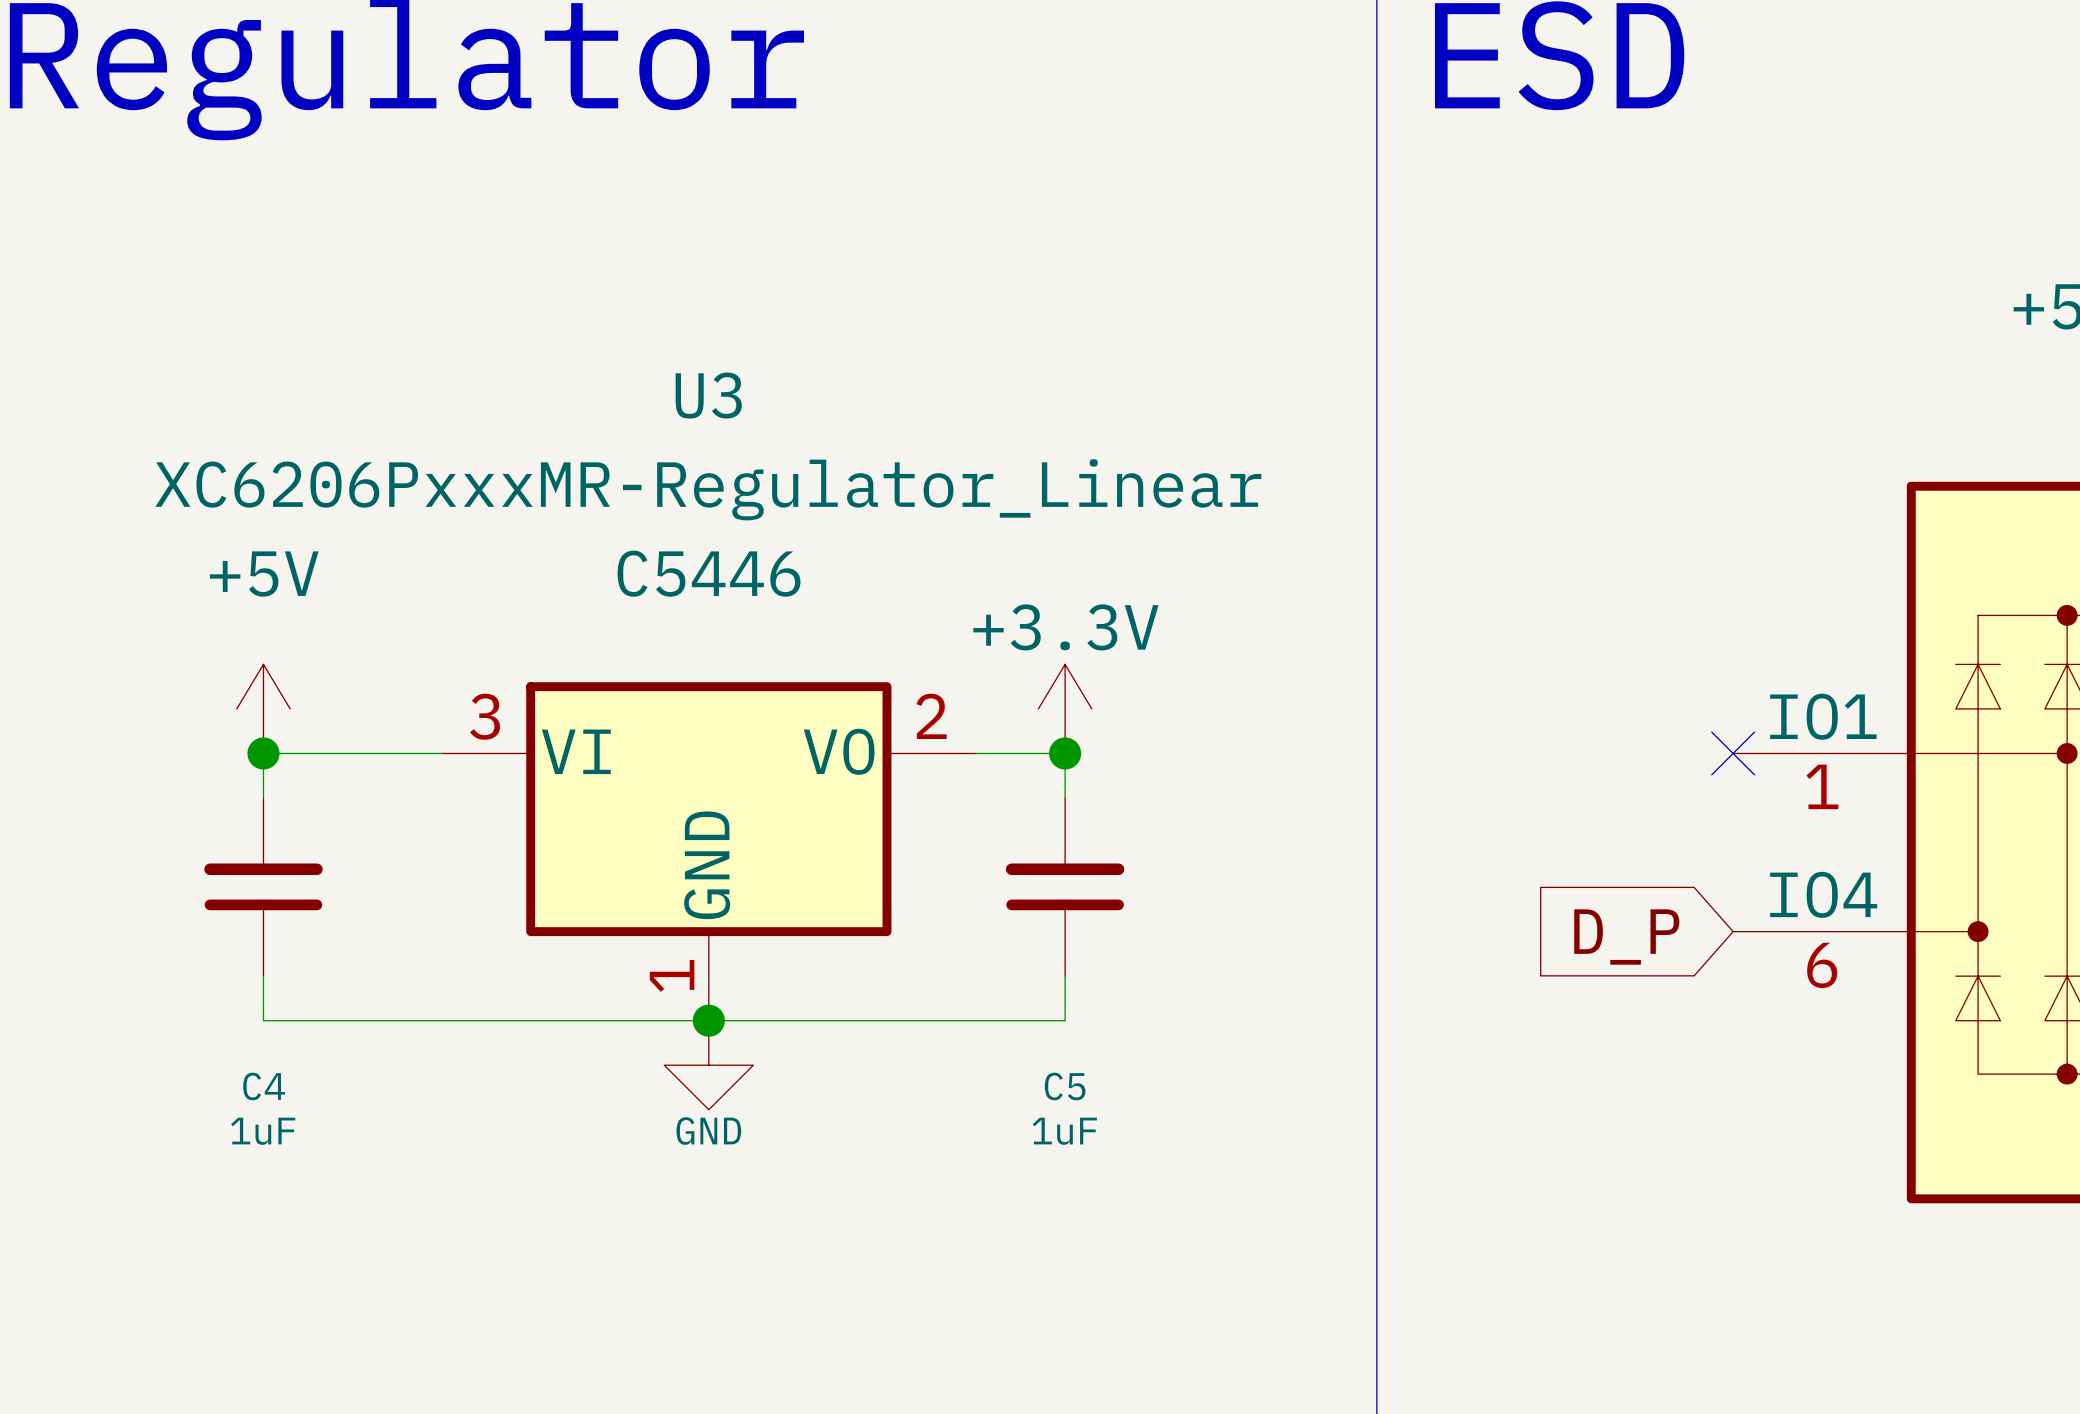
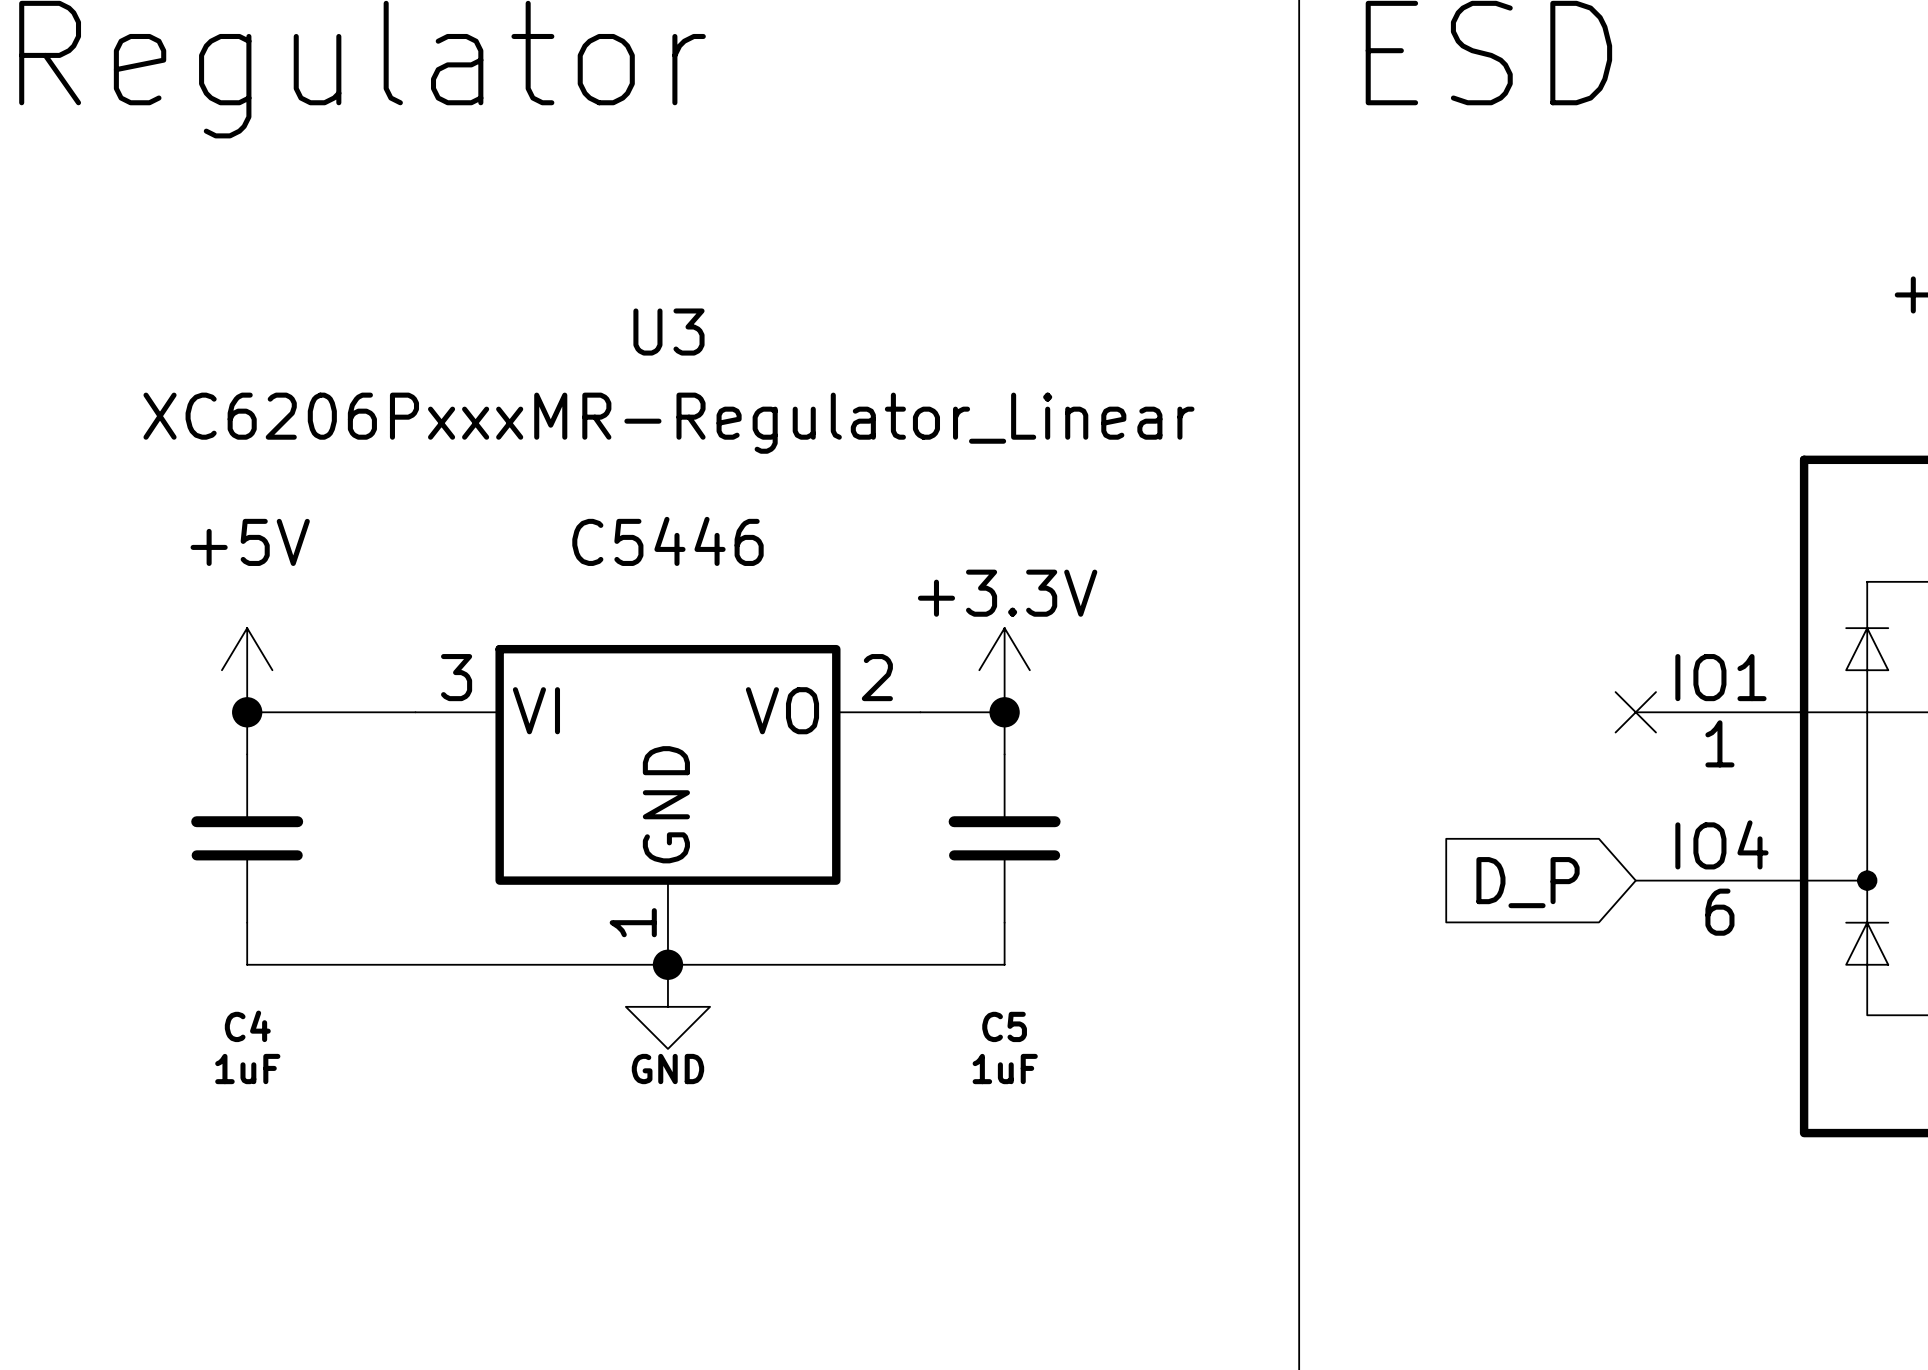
U3 name position: U3 (708, 395) -> U3 (668, 332)
U3 value position: XC6206PxxxMR-Regulator_Linear (708, 489) -> XC6206PxxxMR-Regulator_Linear (668, 423)

